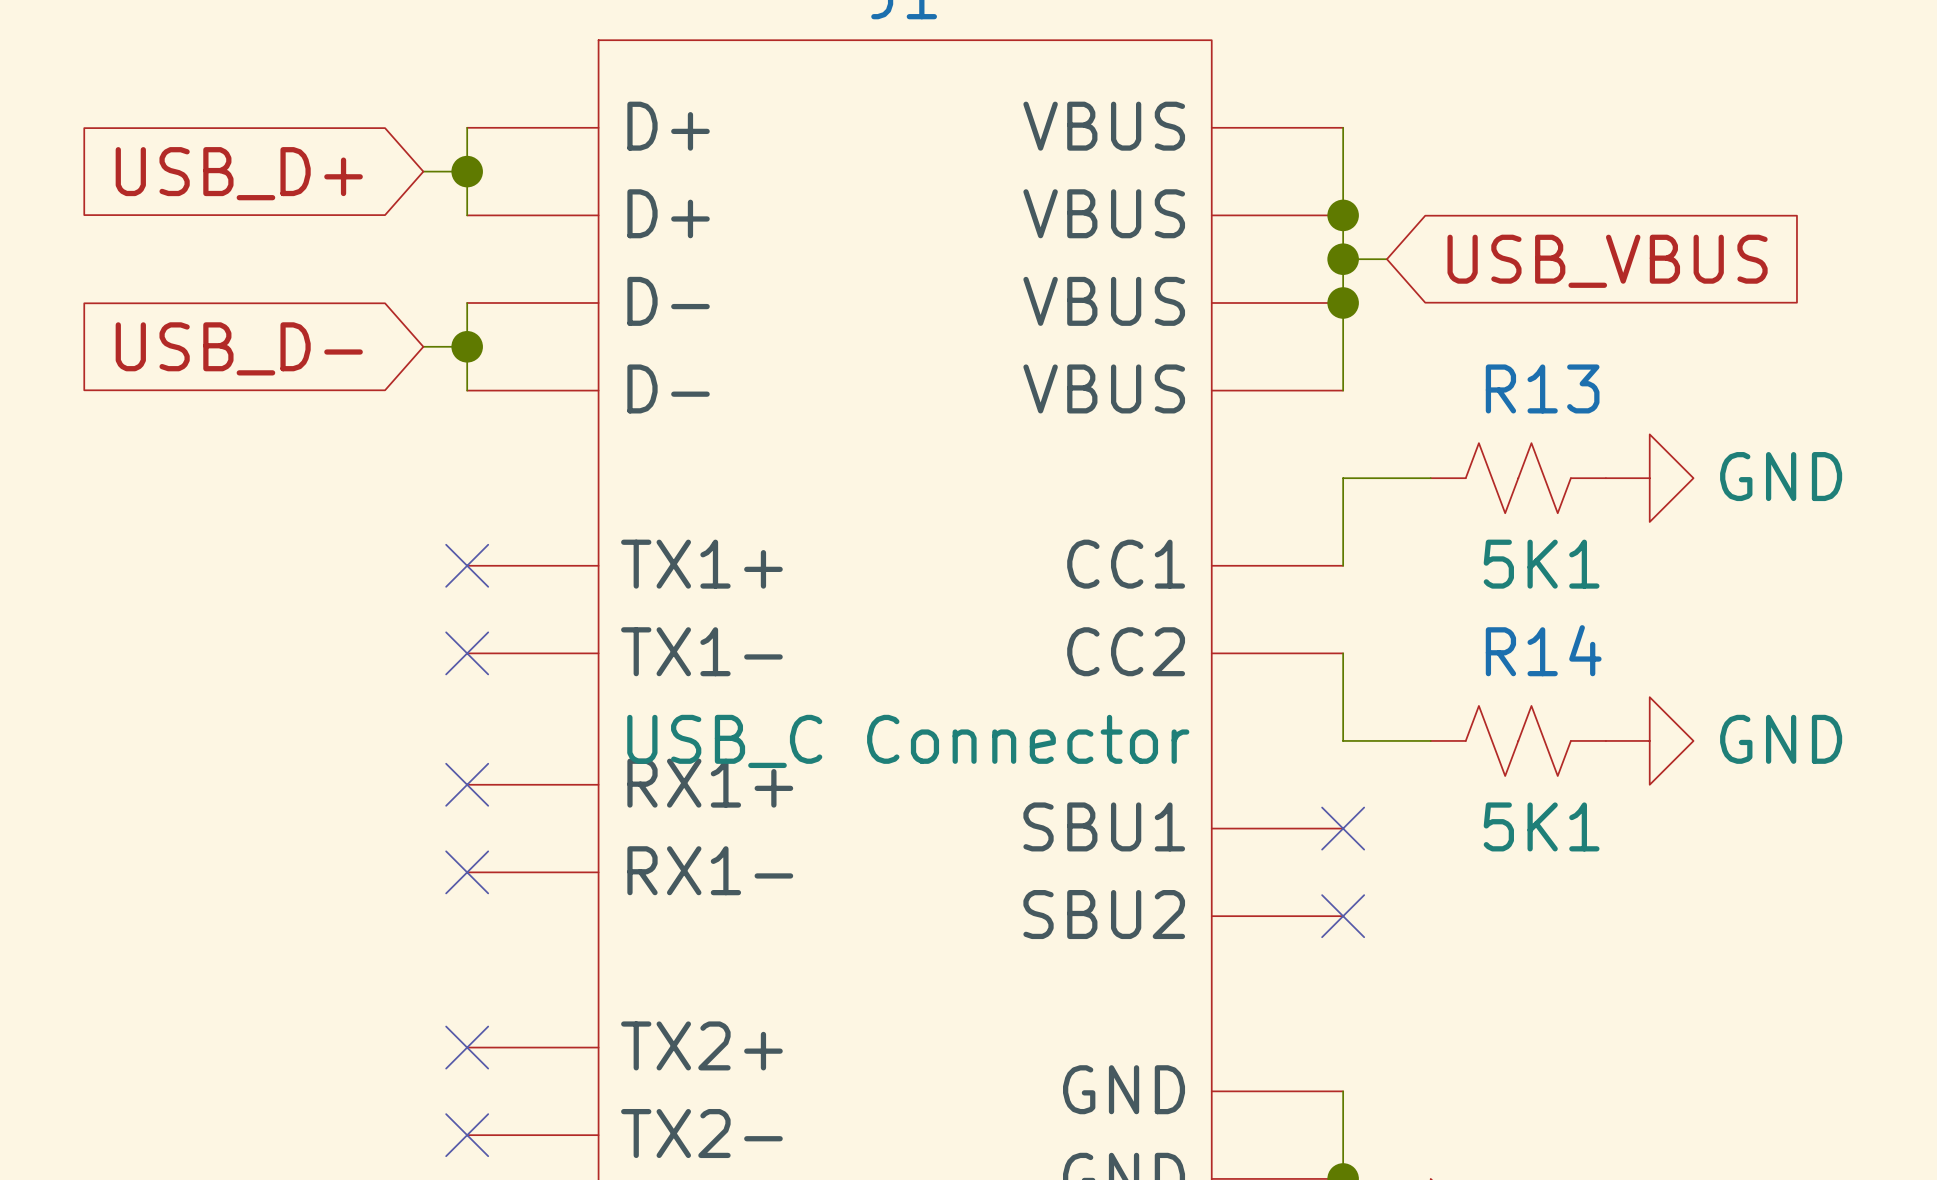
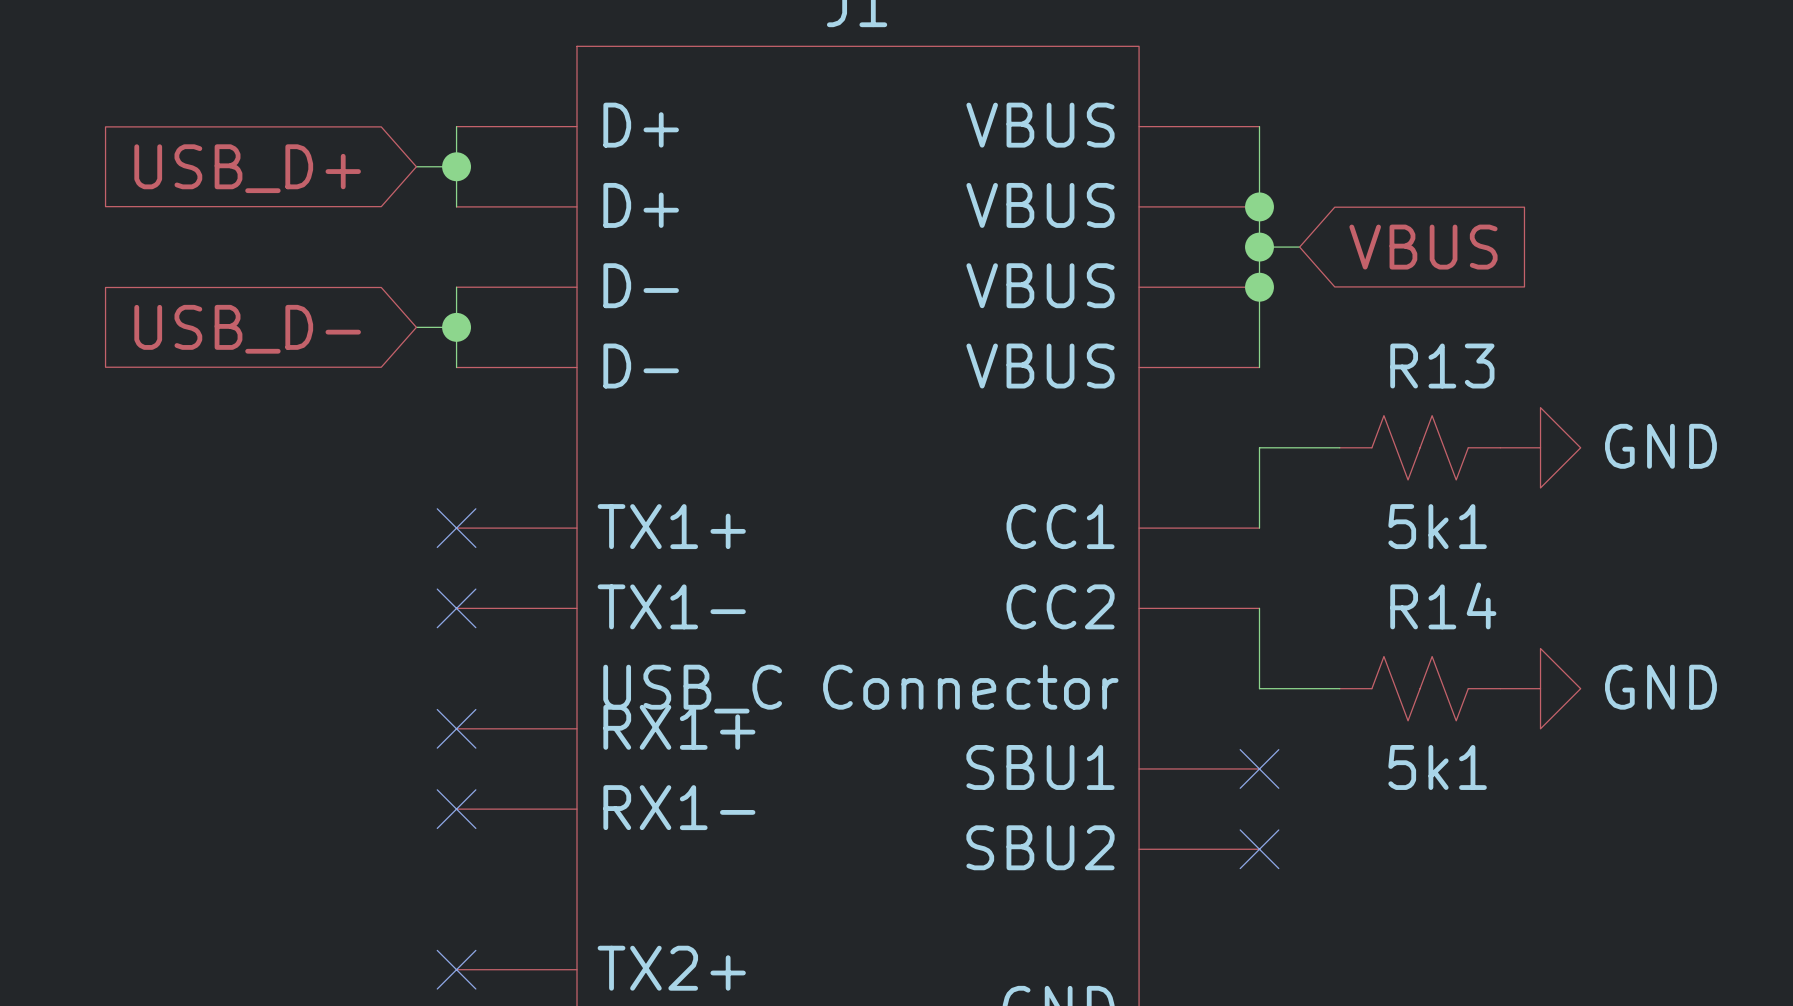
global label: USB_VBUS (1607, 261) -> VBUS (1423, 247)
R13 value: 5K1 (1541, 564) -> 5k1 (1437, 526)
R14 value: 5K1 (1541, 826) -> 5k1 (1437, 767)

